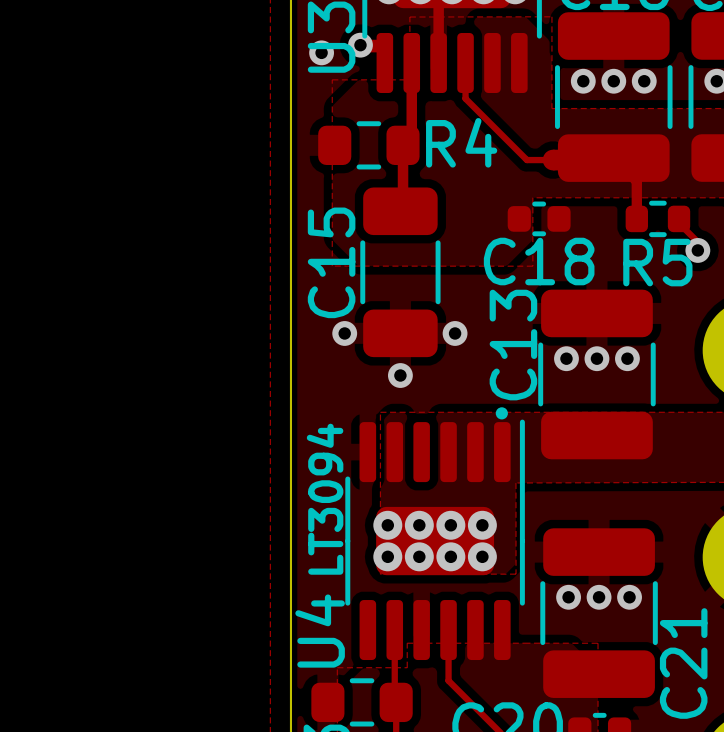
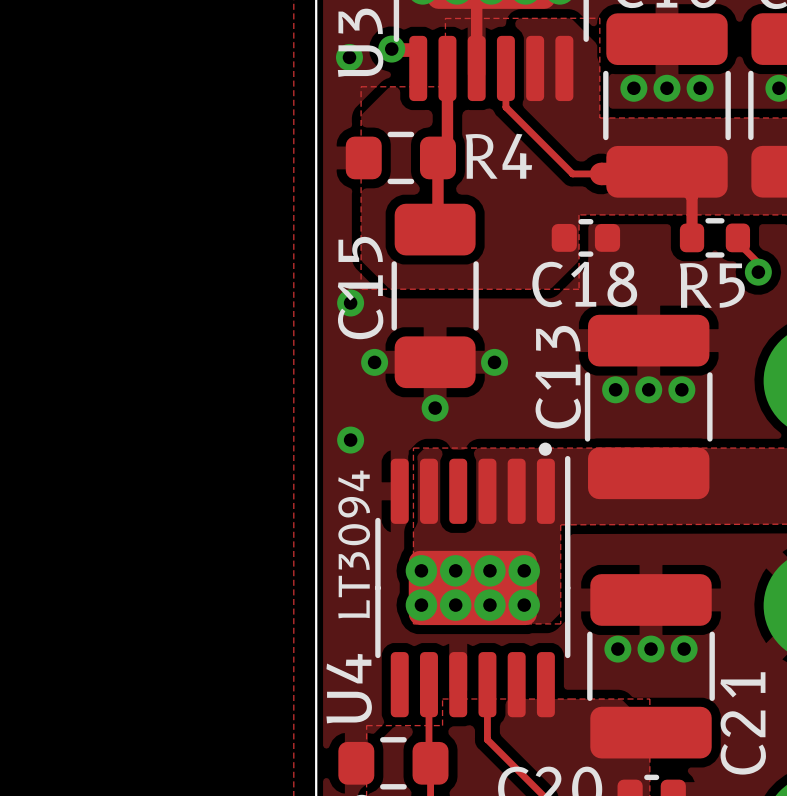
via: none -> (350, 303)
via: none -> (350, 440)

